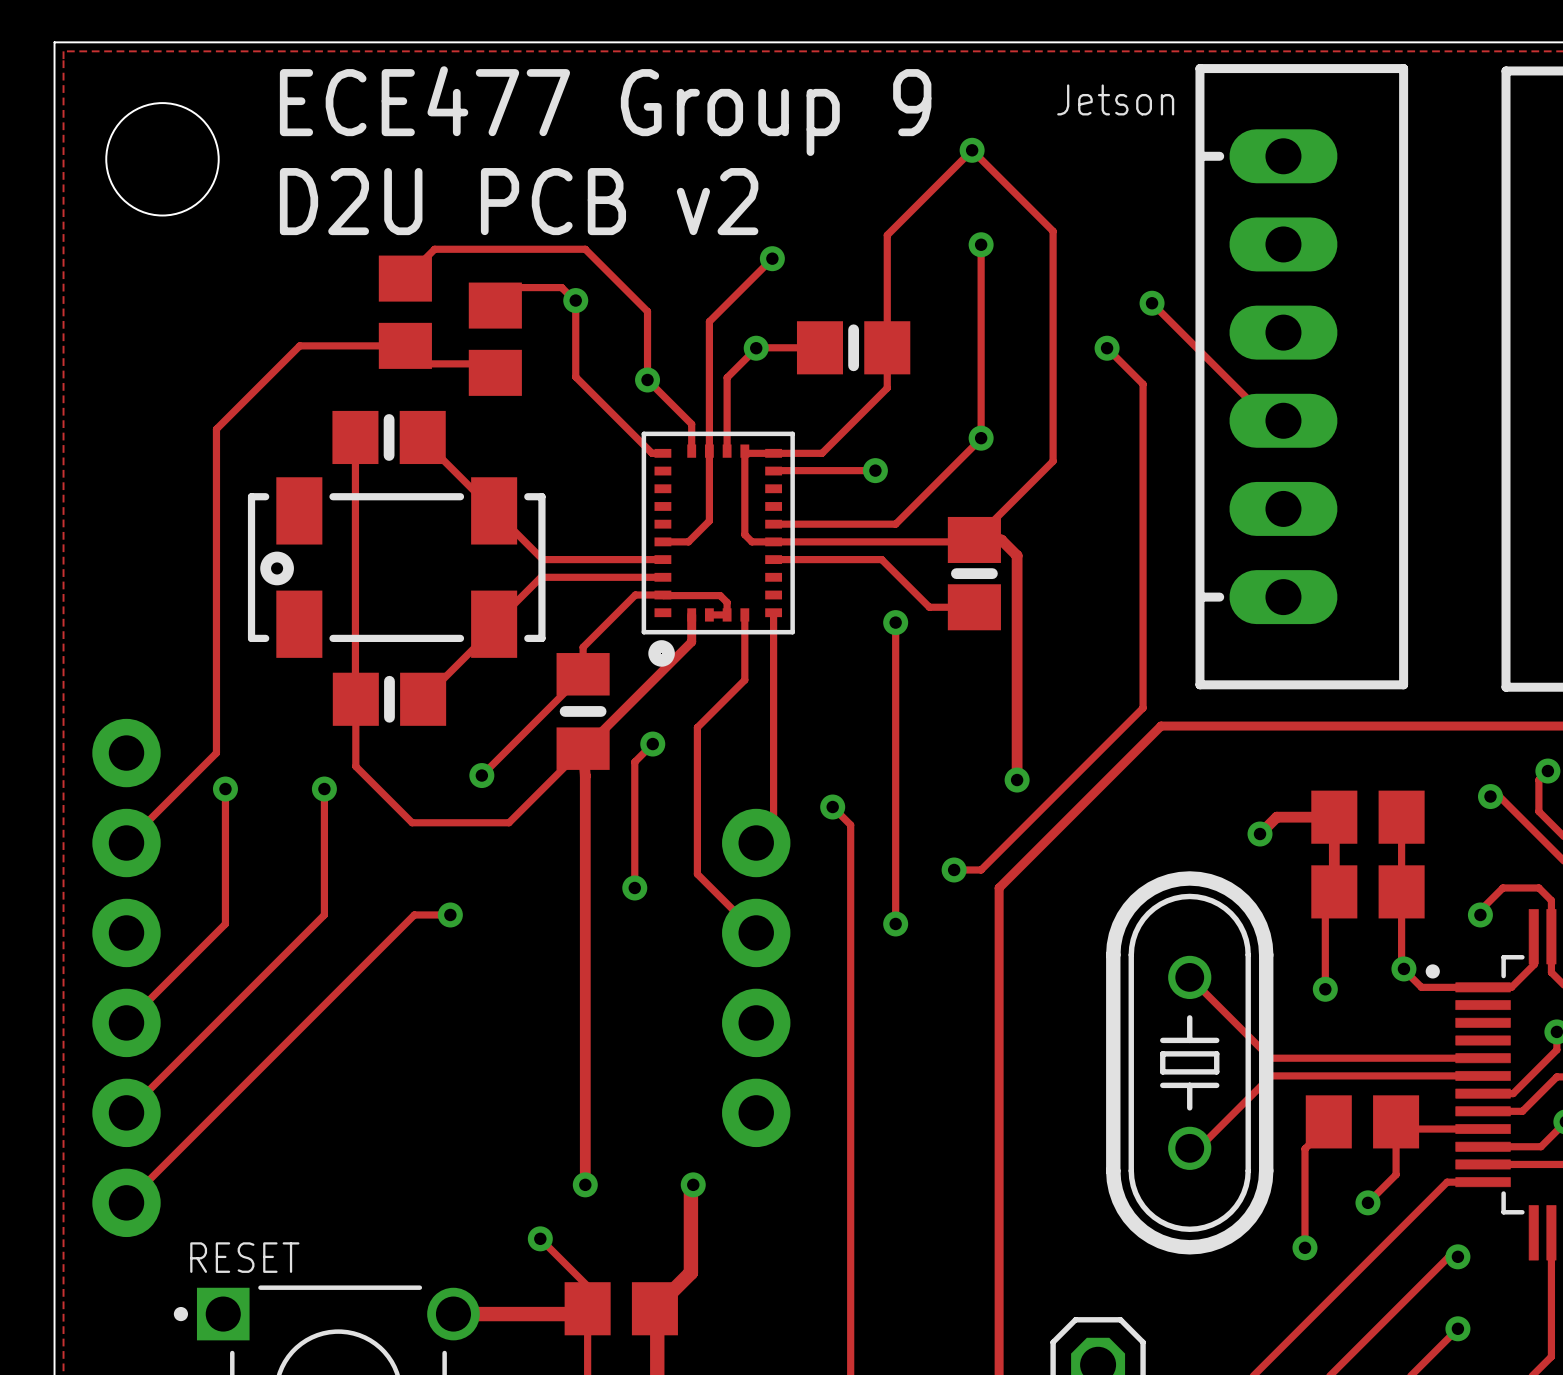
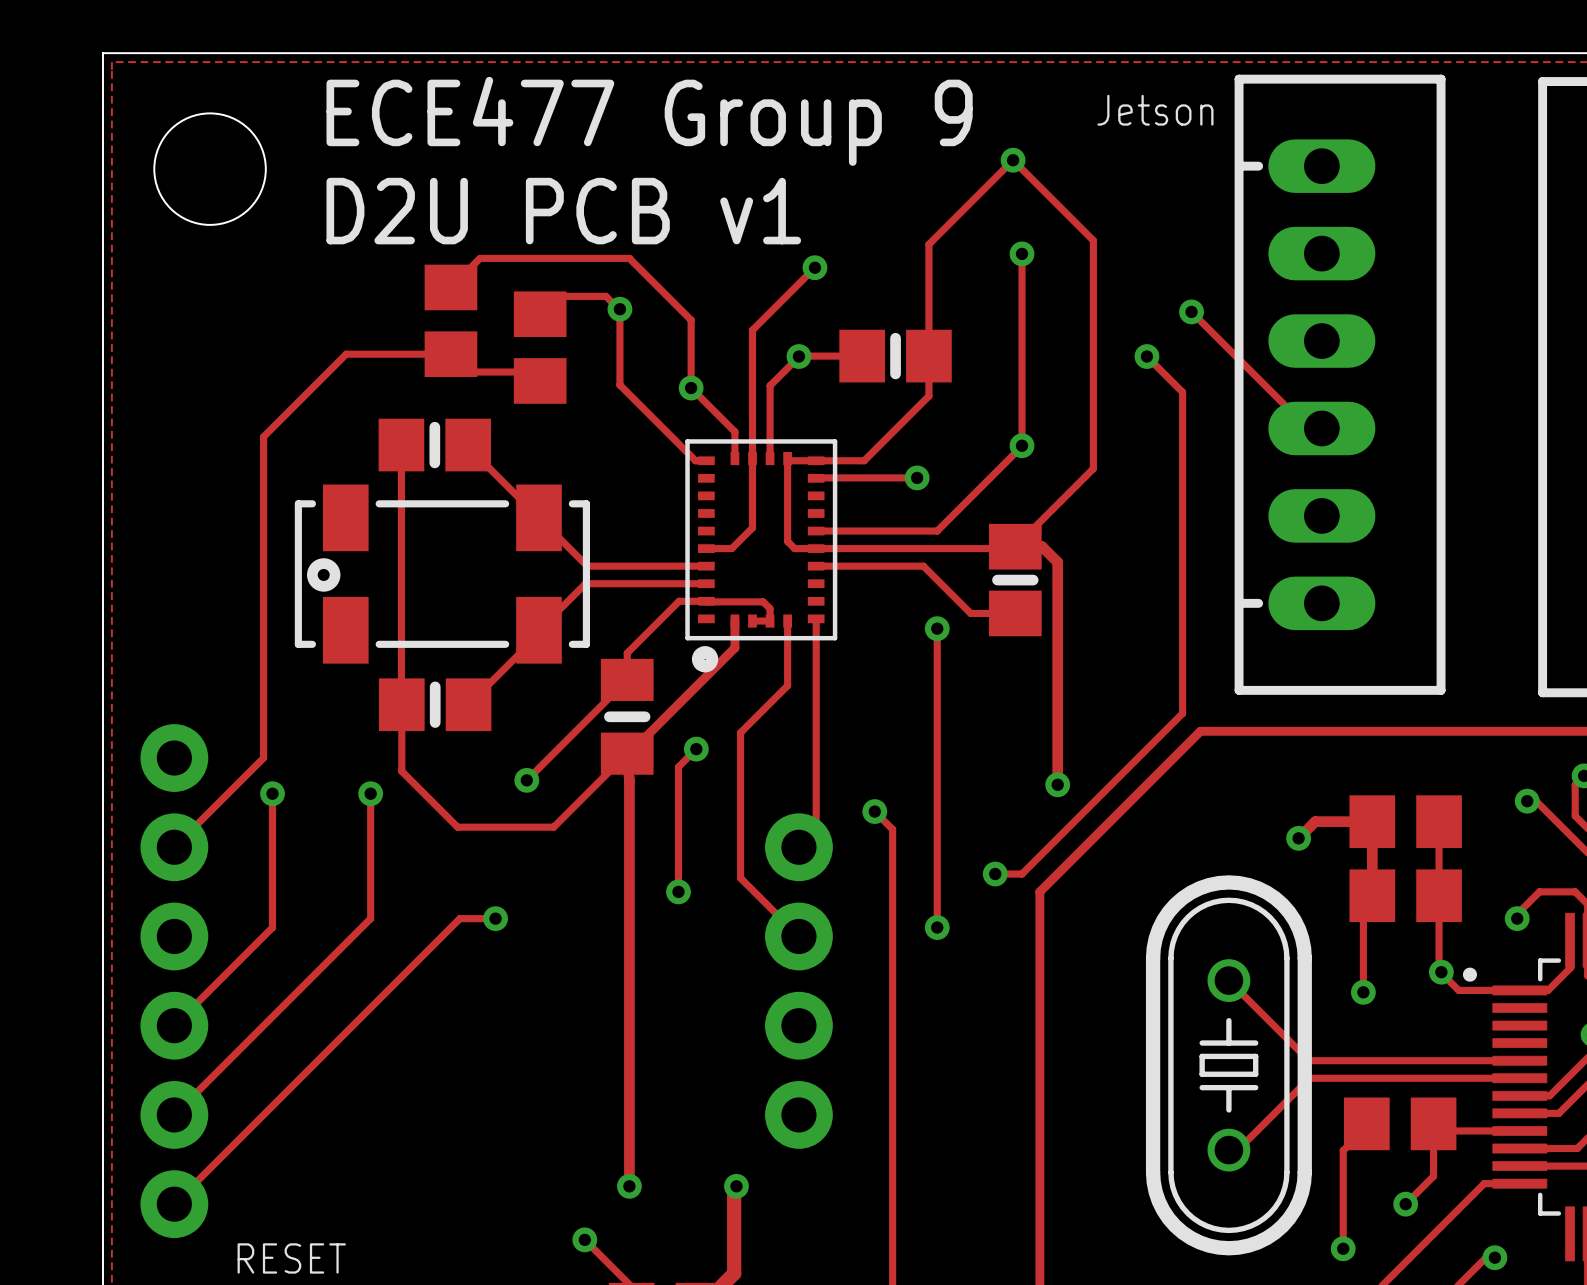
text: D2U PCB v2 (519, 201) -> D2U PCB v1 (563, 211)

